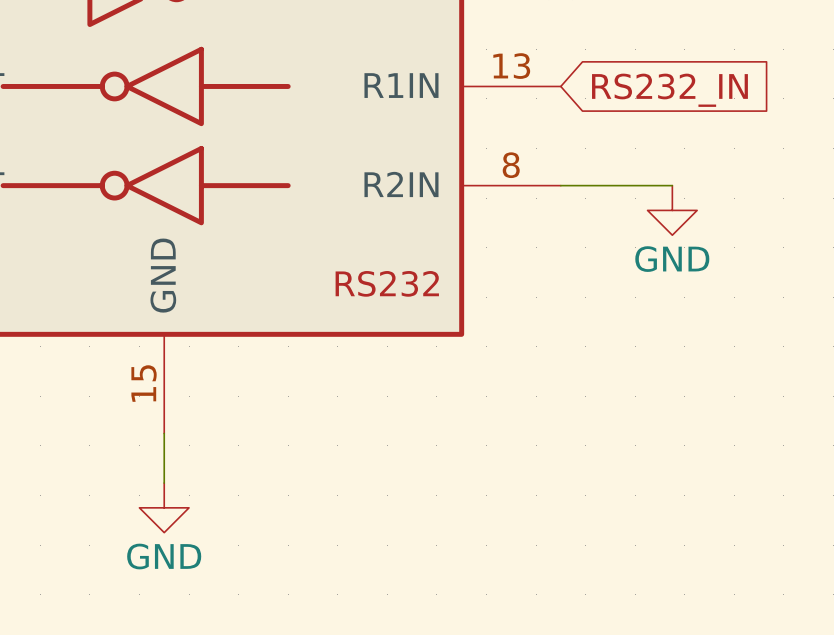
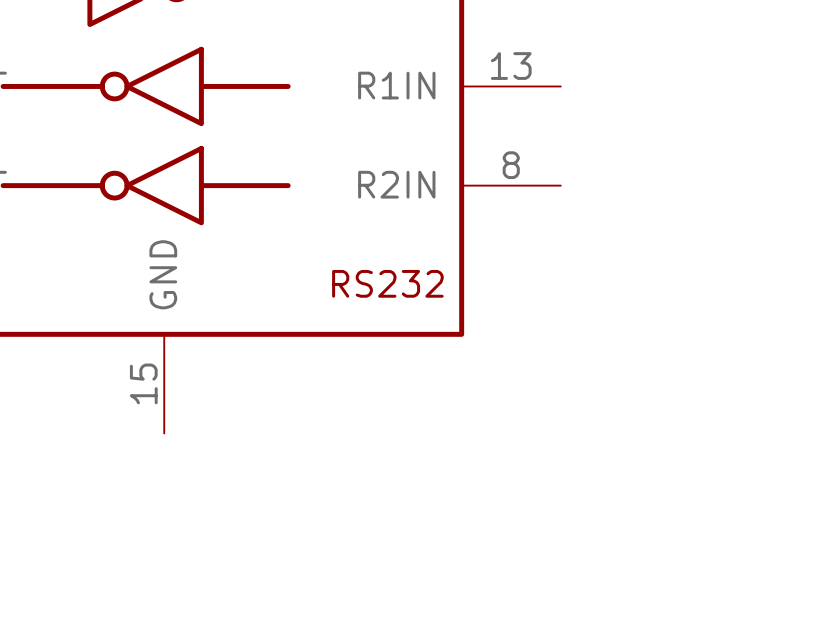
global label: RS232_IN (669, 90) -> none
wire: (560, 185) (672, 185) -> none
power symbol: GND (672, 210) -> none
wire: (164, 433) (164, 483) -> none
power symbol: GND (164, 507) -> none

